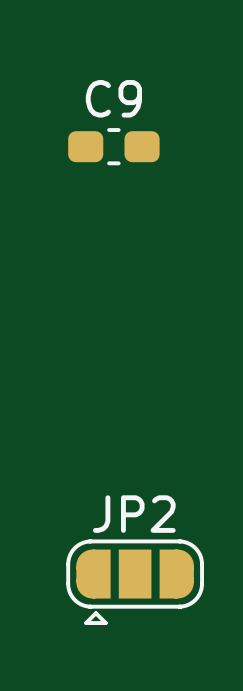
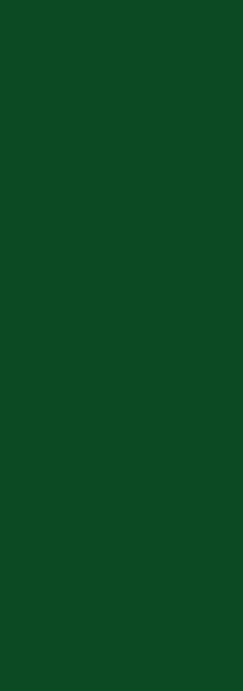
C9: (113, 146) -> none
JP2: (135, 582) -> none

